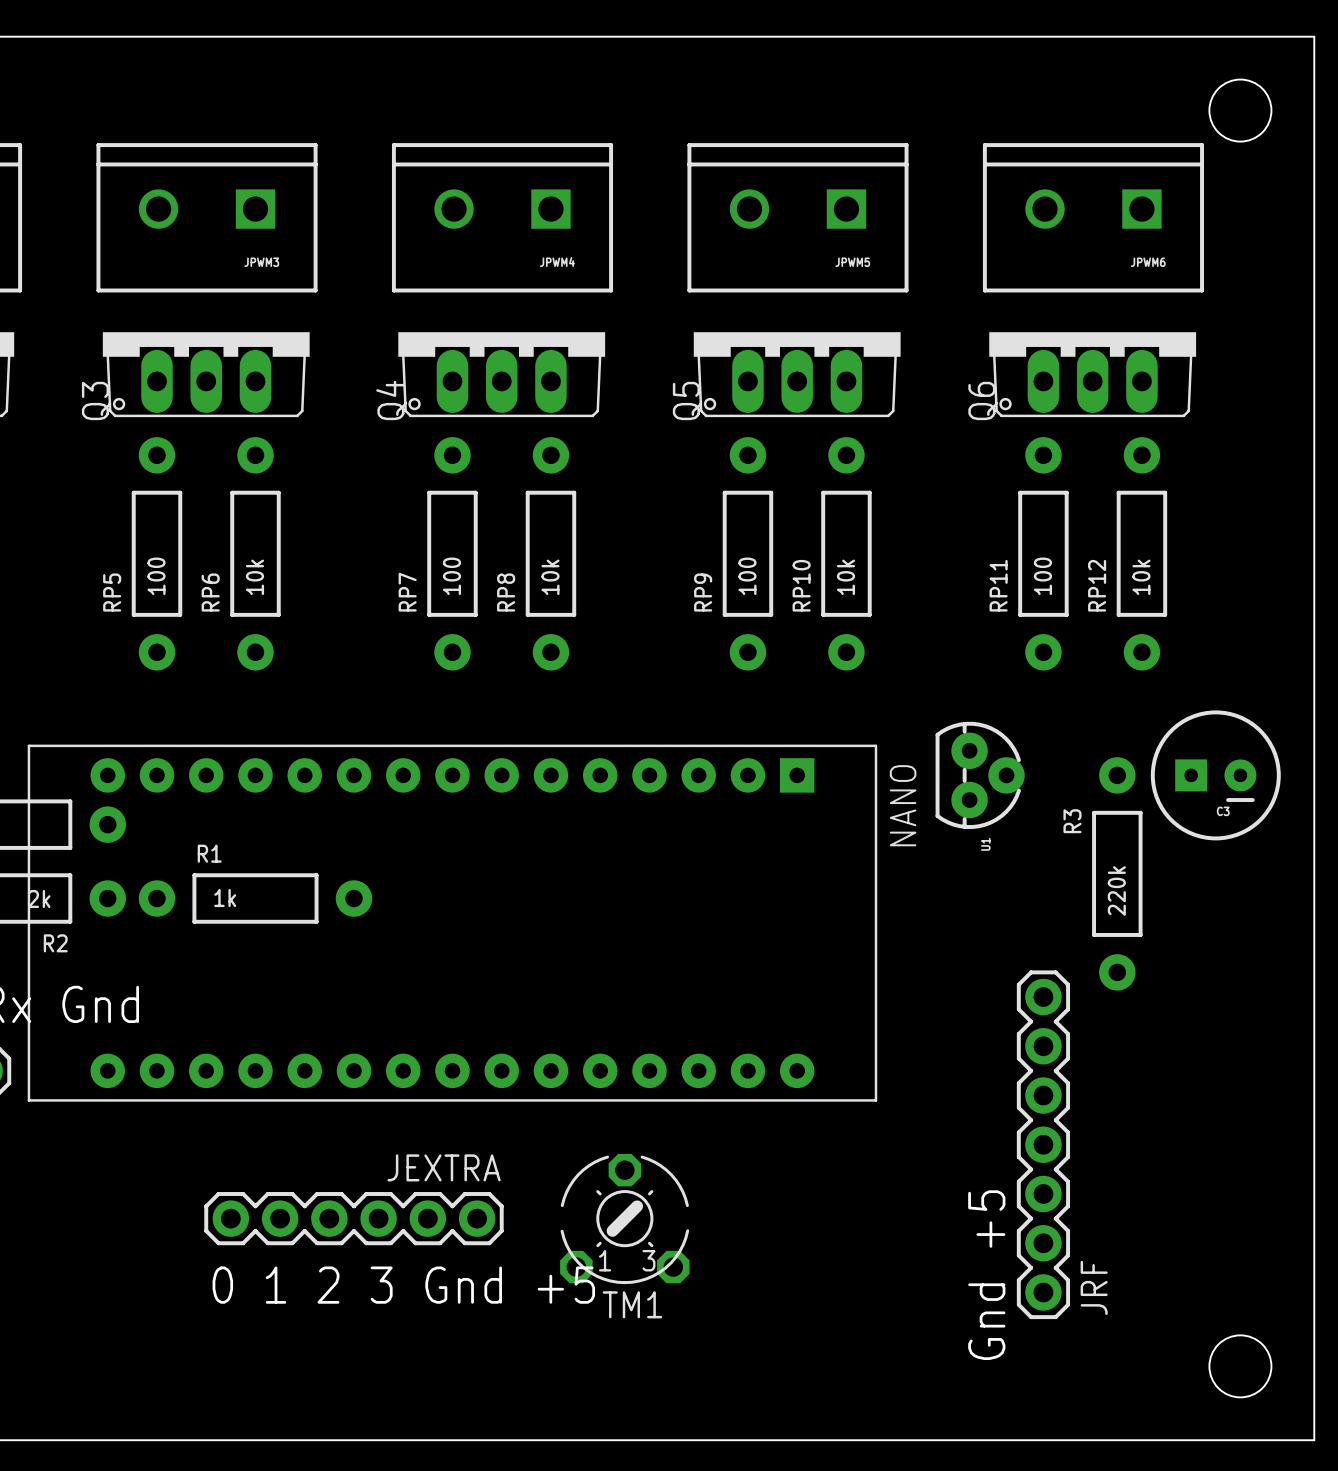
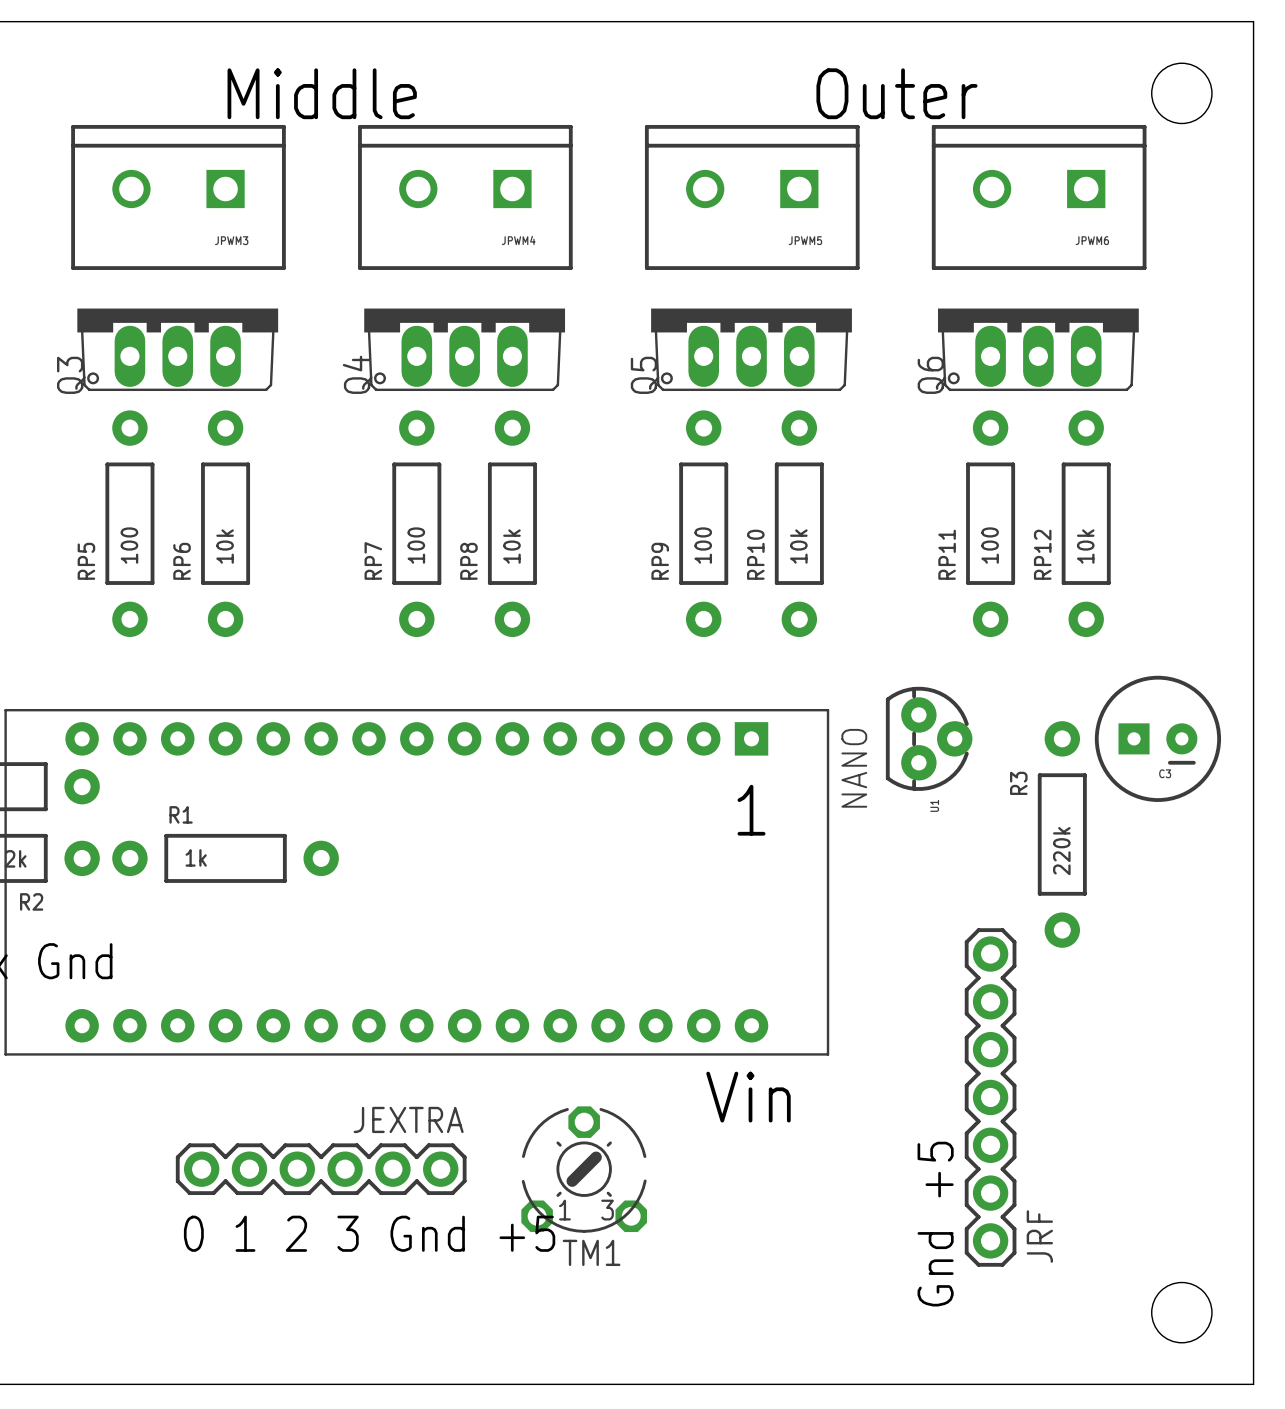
text: none -> Middle (322, 93)
text: none -> Outer (896, 93)
text: none -> 1 (751, 810)
text: none -> Vin (748, 1097)

